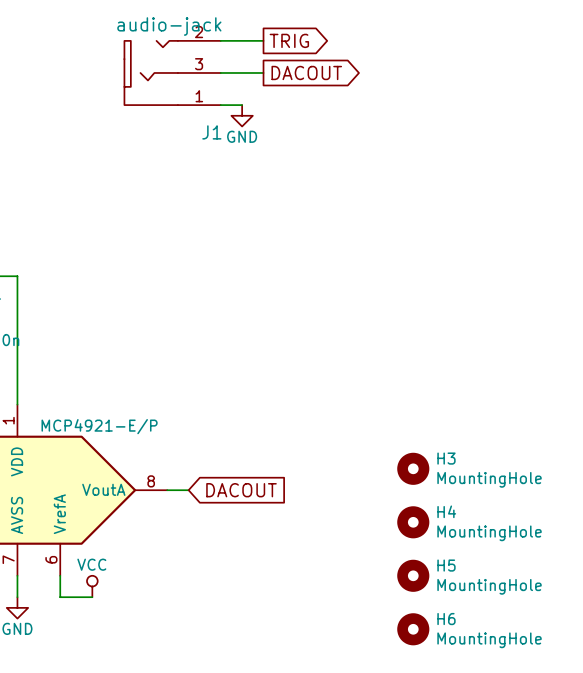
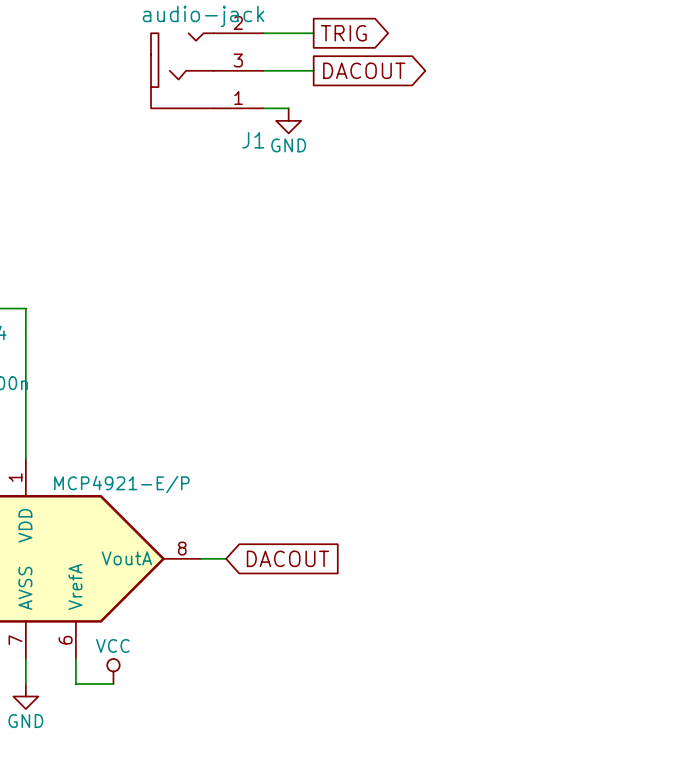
H3: MountingHole (413, 468) -> none
H4: MountingHole (413, 522) -> none
H5: MountingHole (413, 575) -> none
H6: MountingHole (413, 629) -> none

